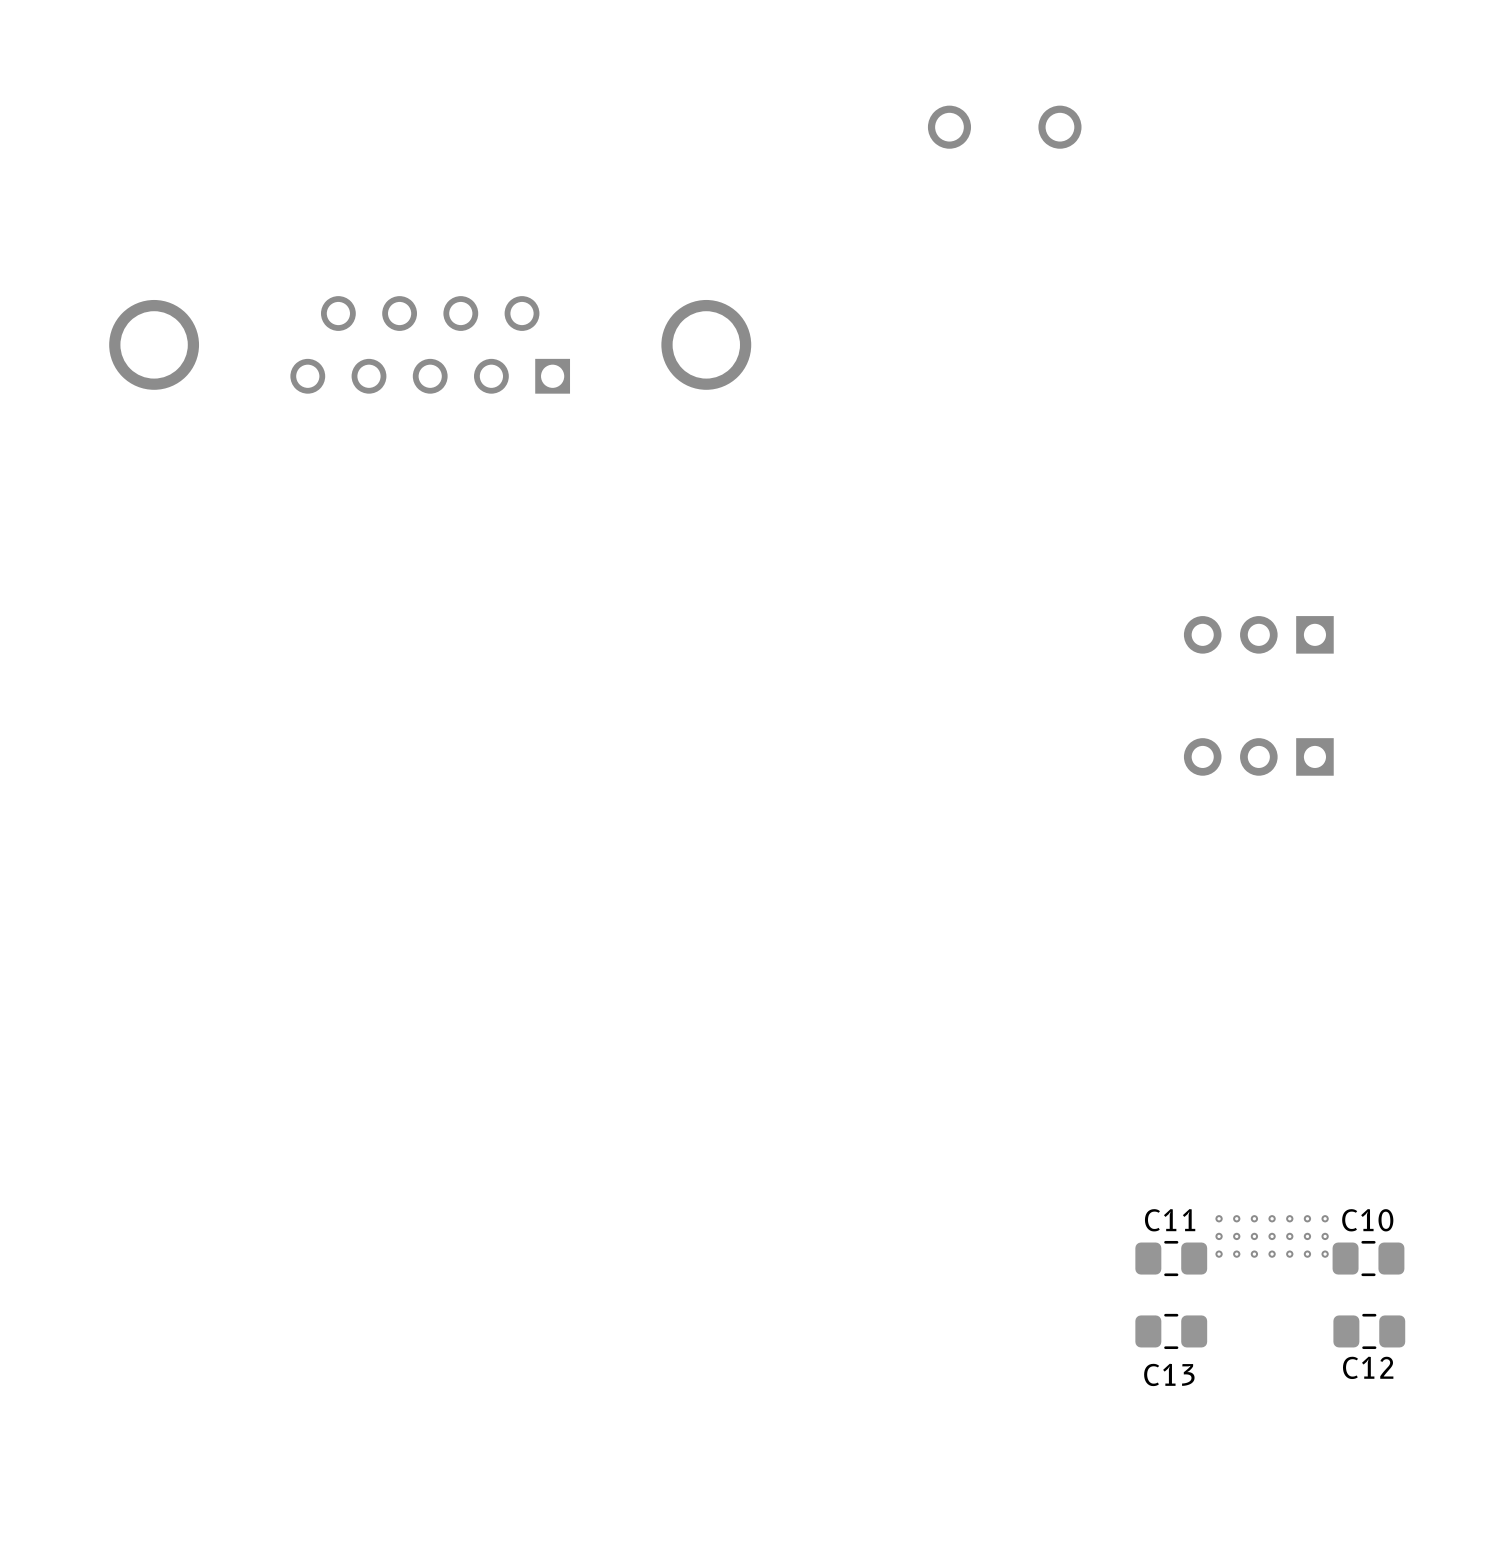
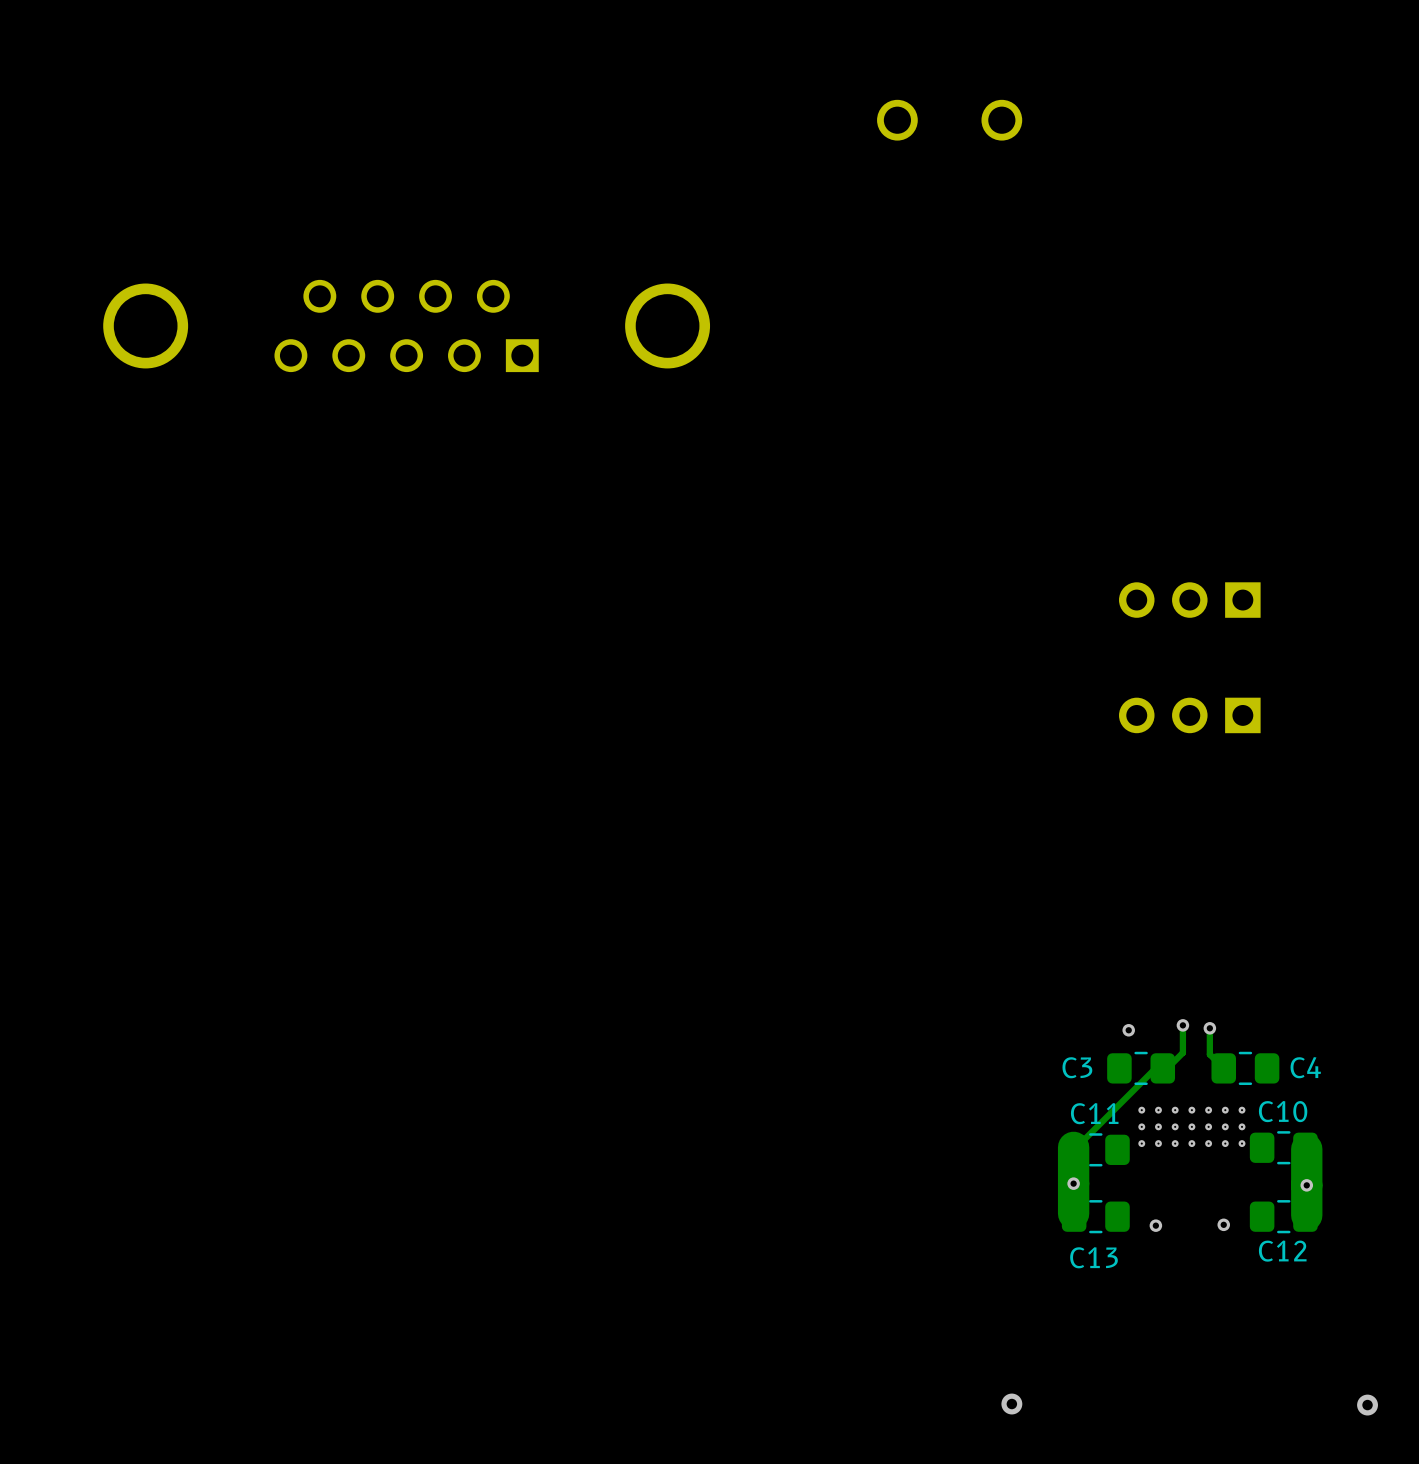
track: none -> (1182, 1025) (1182, 1052) (1167, 1068) (1155, 1068) (1074, 1149)
via: none -> (1182, 1025)
track: none -> (1209, 1028) (1209, 1054) (1223, 1068)
via: none -> (1209, 1028)
via: none -> (1128, 1030)
C3: none -> (1141, 1068)
C4: none -> (1245, 1068)
via: none -> (1141, 1110)
via: none -> (1158, 1110)
via: none -> (1175, 1110)
via: none -> (1191, 1110)
via: none -> (1208, 1110)
via: none -> (1225, 1110)
via: none -> (1242, 1110)
via: none -> (1141, 1126)
via: none -> (1158, 1126)
via: none -> (1175, 1126)
via: none -> (1191, 1126)
via: none -> (1208, 1126)
via: none -> (1225, 1126)
via: none -> (1242, 1126)
via: none -> (1141, 1143)
via: none -> (1158, 1143)
via: none -> (1175, 1143)
via: none -> (1191, 1143)
via: none -> (1208, 1143)
via: none -> (1225, 1143)
via: none -> (1242, 1143)
track: none -> (1073, 1147) (1073, 1213)
track: none -> (1306, 1149) (1306, 1215)
via: (1219, 1218) -> none
via: (1236, 1218) -> none
via: (1254, 1218) -> none
via: (1272, 1218) -> none
via: (1289, 1218) -> none
via: (1307, 1218) -> none
via: (1325, 1218) -> none
via: (1219, 1236) -> none
via: (1236, 1236) -> none
via: (1254, 1236) -> none
via: (1272, 1236) -> none
via: (1289, 1236) -> none
via: (1307, 1236) -> none
via: (1325, 1236) -> none
via: none -> (1073, 1183)
via: (1219, 1254) -> none
via: (1236, 1254) -> none
via: (1254, 1254) -> none
via: (1272, 1254) -> none
via: (1289, 1254) -> none
via: (1307, 1254) -> none
via: (1325, 1254) -> none
via: none -> (1306, 1185)
C11 position: (1171, 1258) -> (1095, 1149)
C10 position: (1368, 1258) -> (1283, 1147)
via: none -> (1223, 1224)
via: none -> (1155, 1225)
C13 position: (1171, 1331) -> (1095, 1216)
C12 position: (1369, 1331) -> (1283, 1216)
via: none -> (1011, 1404)
via: none -> (1367, 1405)

